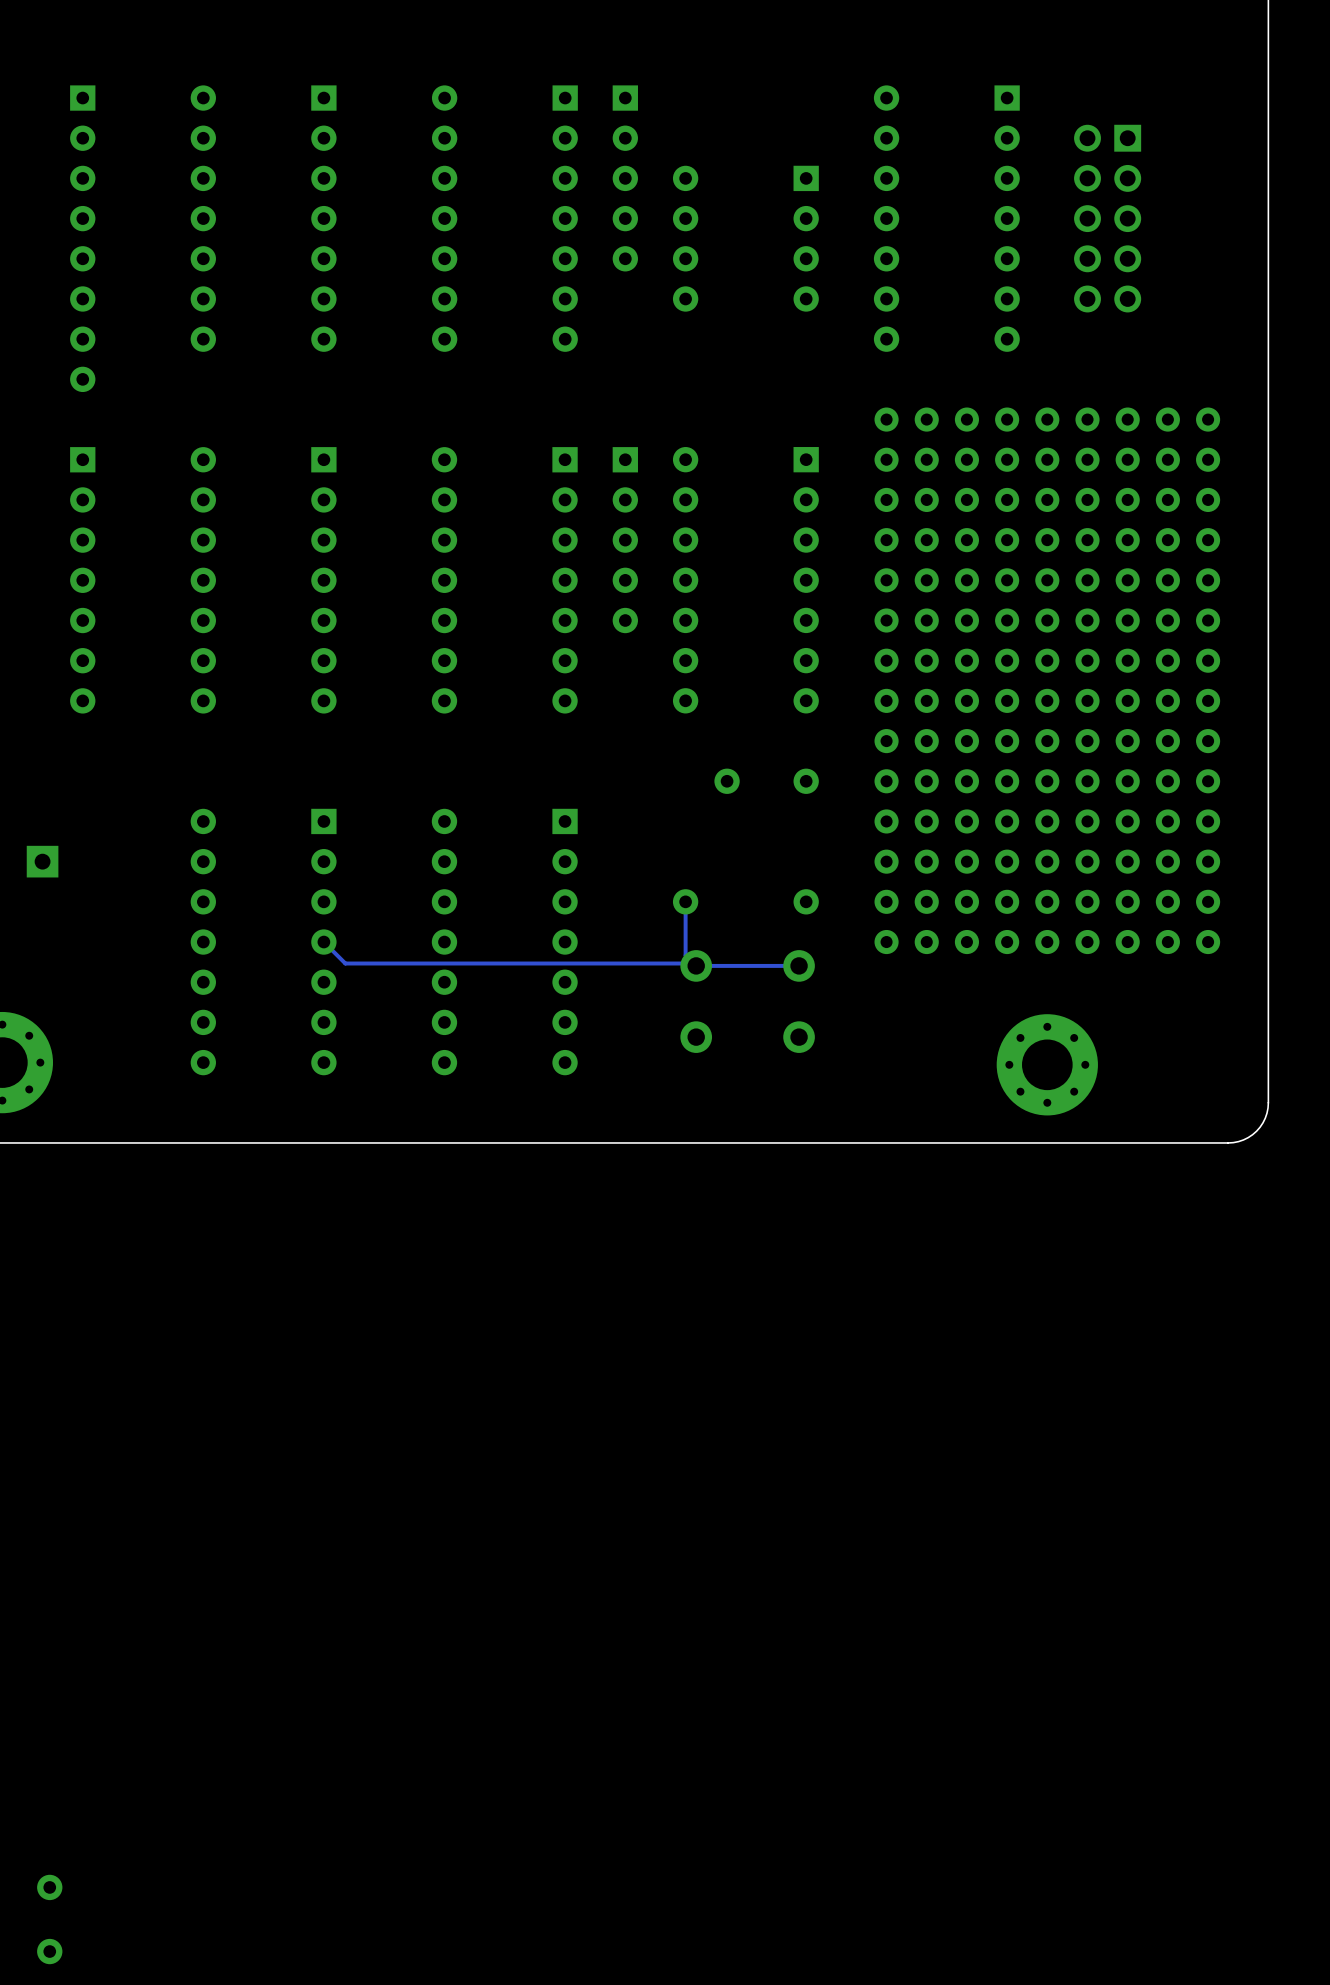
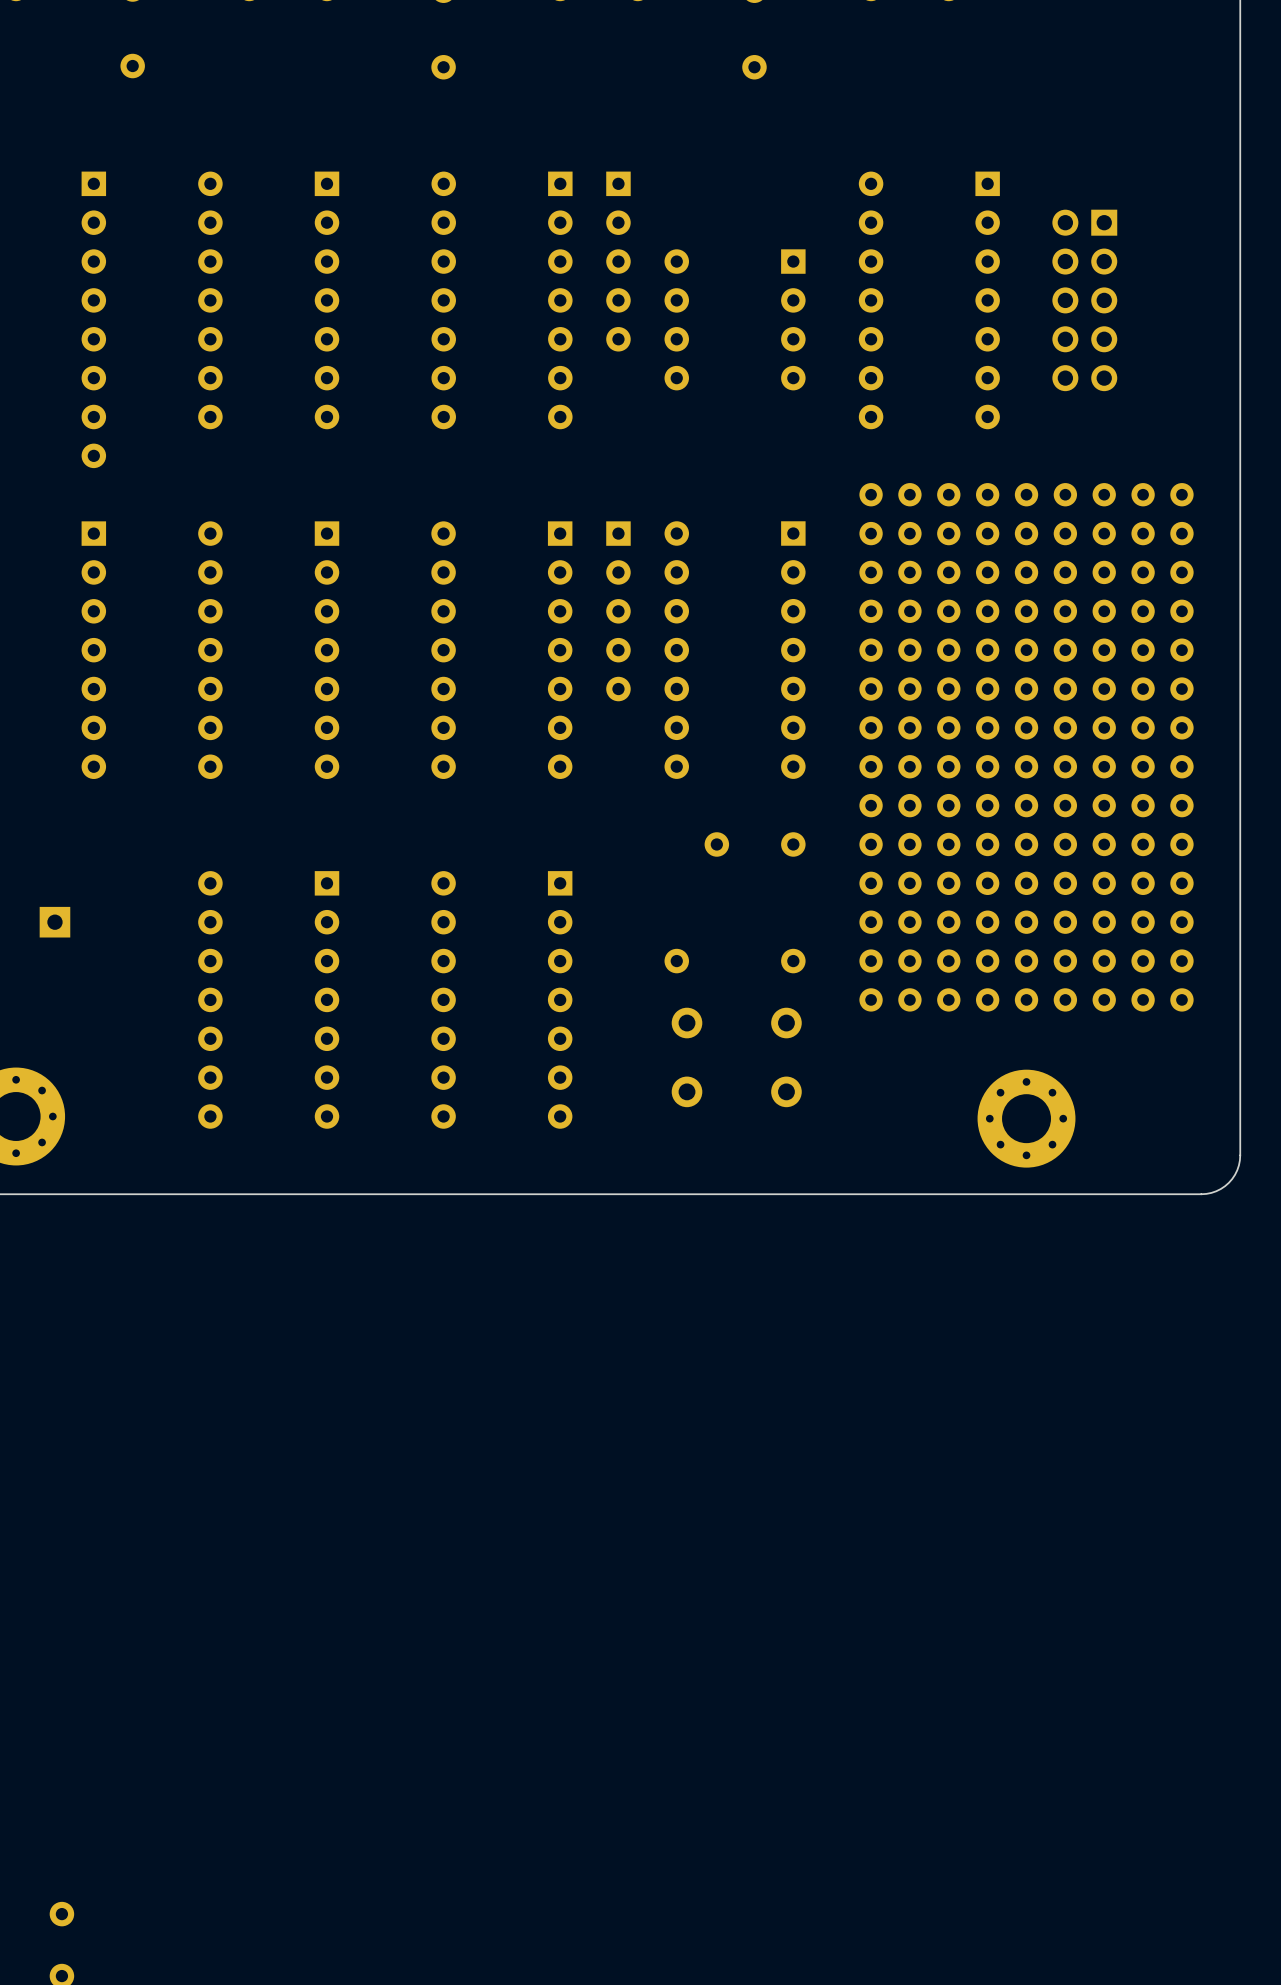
track: (685, 901) (685, 955) (696, 965) (799, 965) -> none
track: (323, 942) (345, 963) (693, 963) -> none

